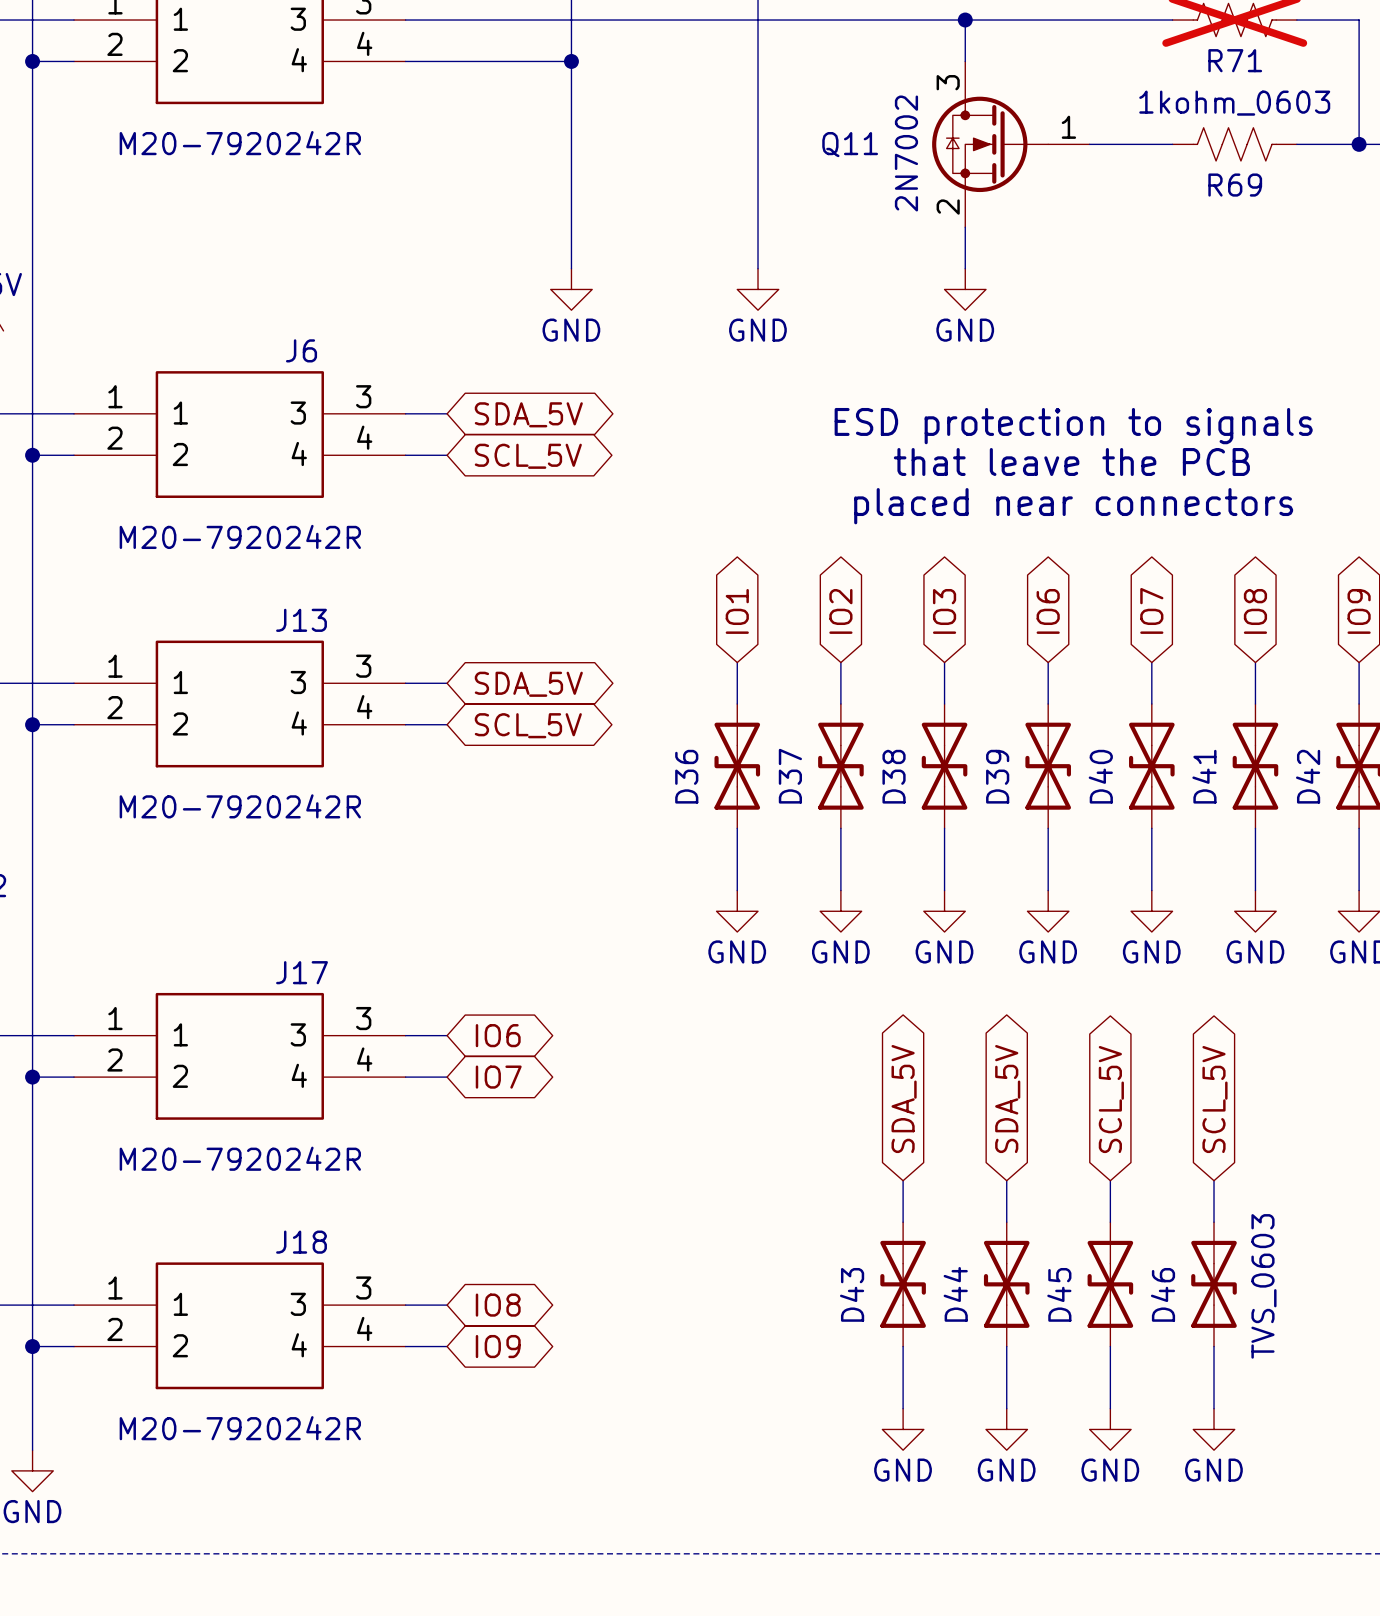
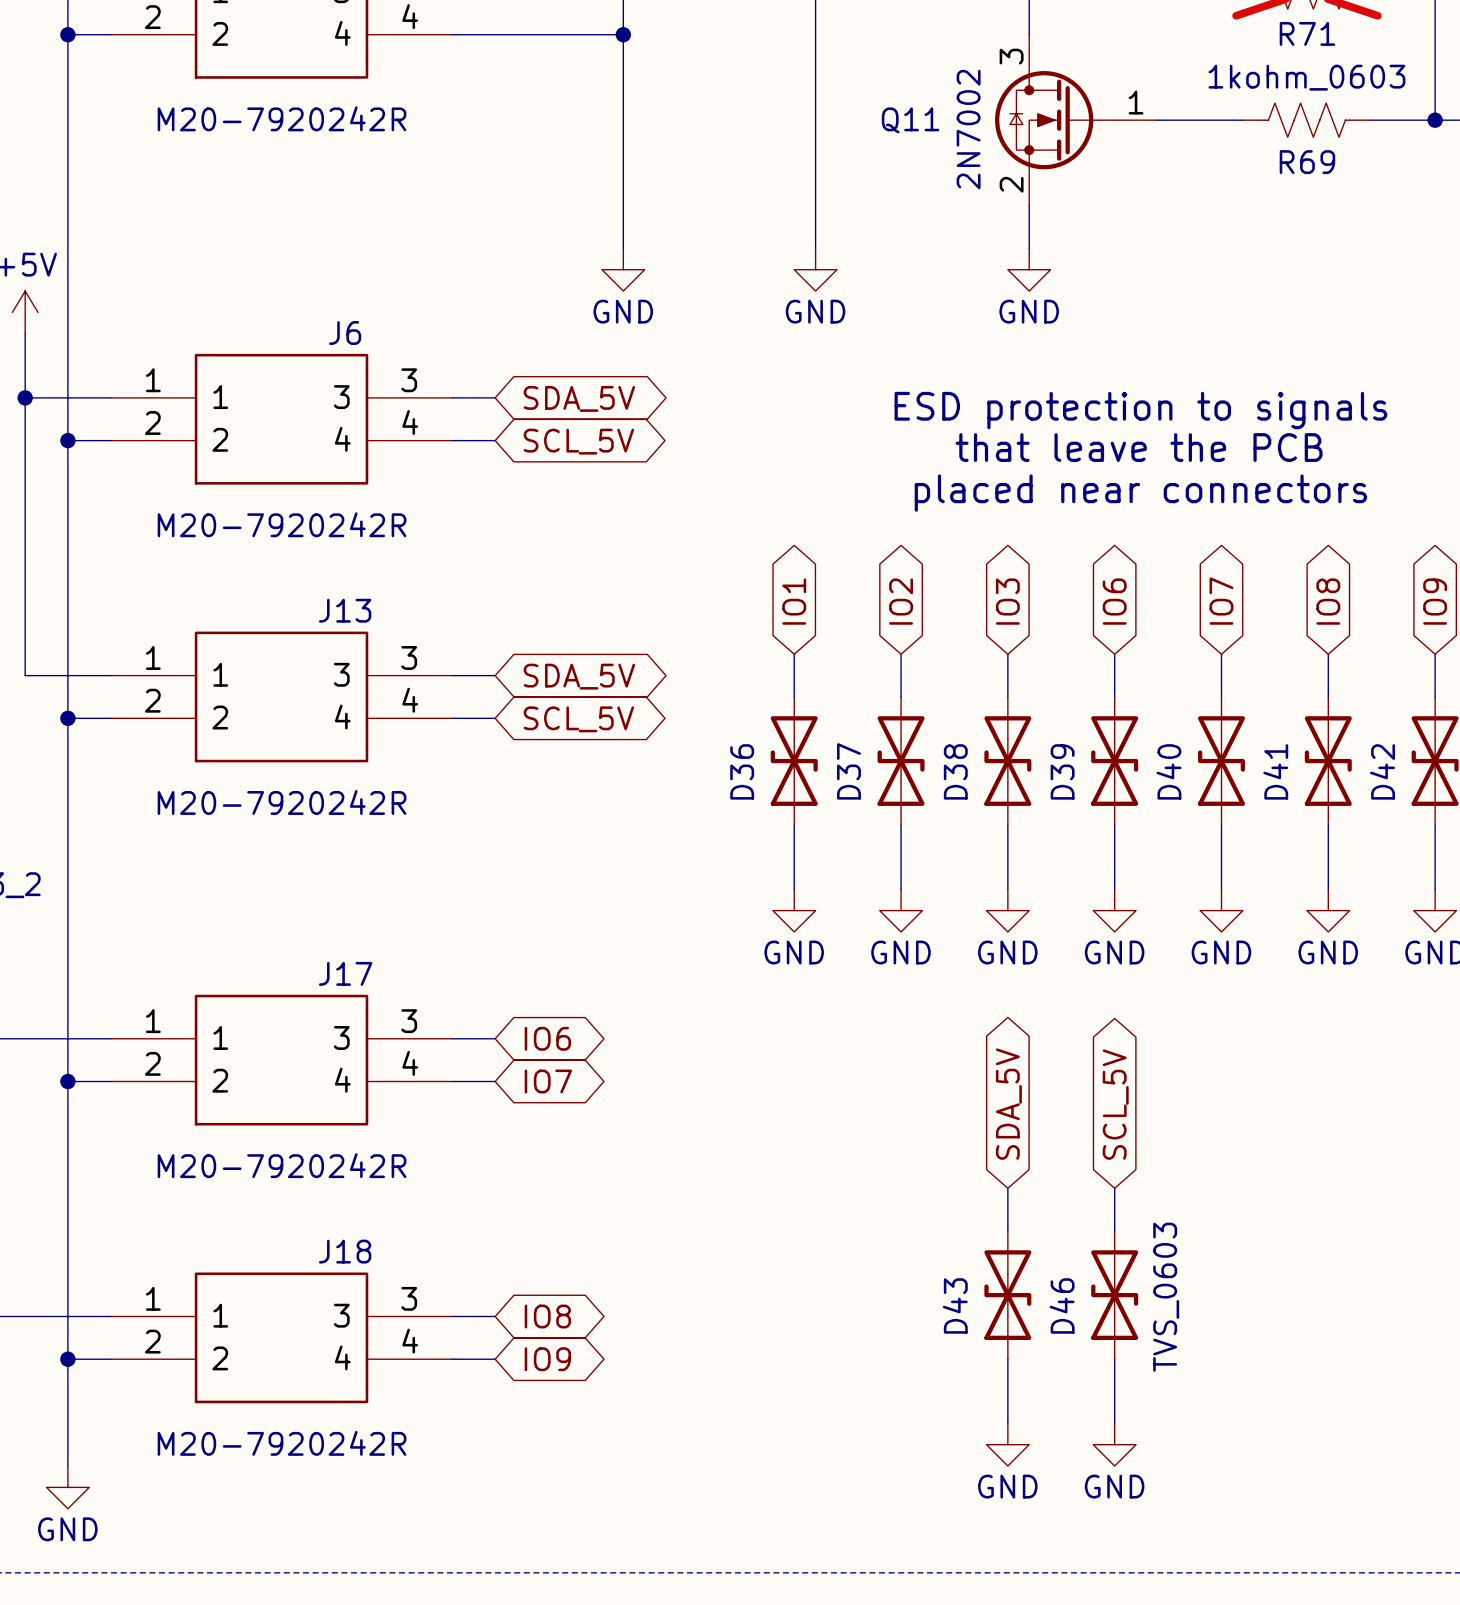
global label position: SDA_5V (904, 1099) -> SDA_5V (1008, 1104)
global label: SDA_5V (1007, 1099) -> none
global label position: SCL_5V (1111, 1099) -> SCL_5V (1115, 1104)
global label: SCL_5V (1214, 1099) -> none
wire: (903, 1180) (903, 1222) -> (1007, 1188) (1007, 1231)
wire: (1006, 1180) (1006, 1222) -> (1114, 1188) (1114, 1231)
wire: (1110, 1180) (1110, 1222) -> none
wire: (1214, 1180) (1214, 1222) -> none
D43 position: (903, 1284) -> (1007, 1295)
D44: (1006, 1284) -> none
D45: (1110, 1284) -> none
D46 position: (1214, 1284) -> (1114, 1295)
wire: (903, 1346) (903, 1408) -> (1007, 1359) (1007, 1423)
wire: (1006, 1346) (1006, 1408) -> (1114, 1359) (1114, 1423)
wire: (1110, 1346) (1110, 1408) -> none
wire: (1214, 1346) (1214, 1408) -> none
power symbol: GND (903, 1429) -> none
power symbol: none -> GND (1007, 1444)
power symbol: GND (1006, 1429) -> none
power symbol: none -> GND (1114, 1444)
power symbol: GND (1110, 1429) -> none
power symbol: GND (1214, 1429) -> none

